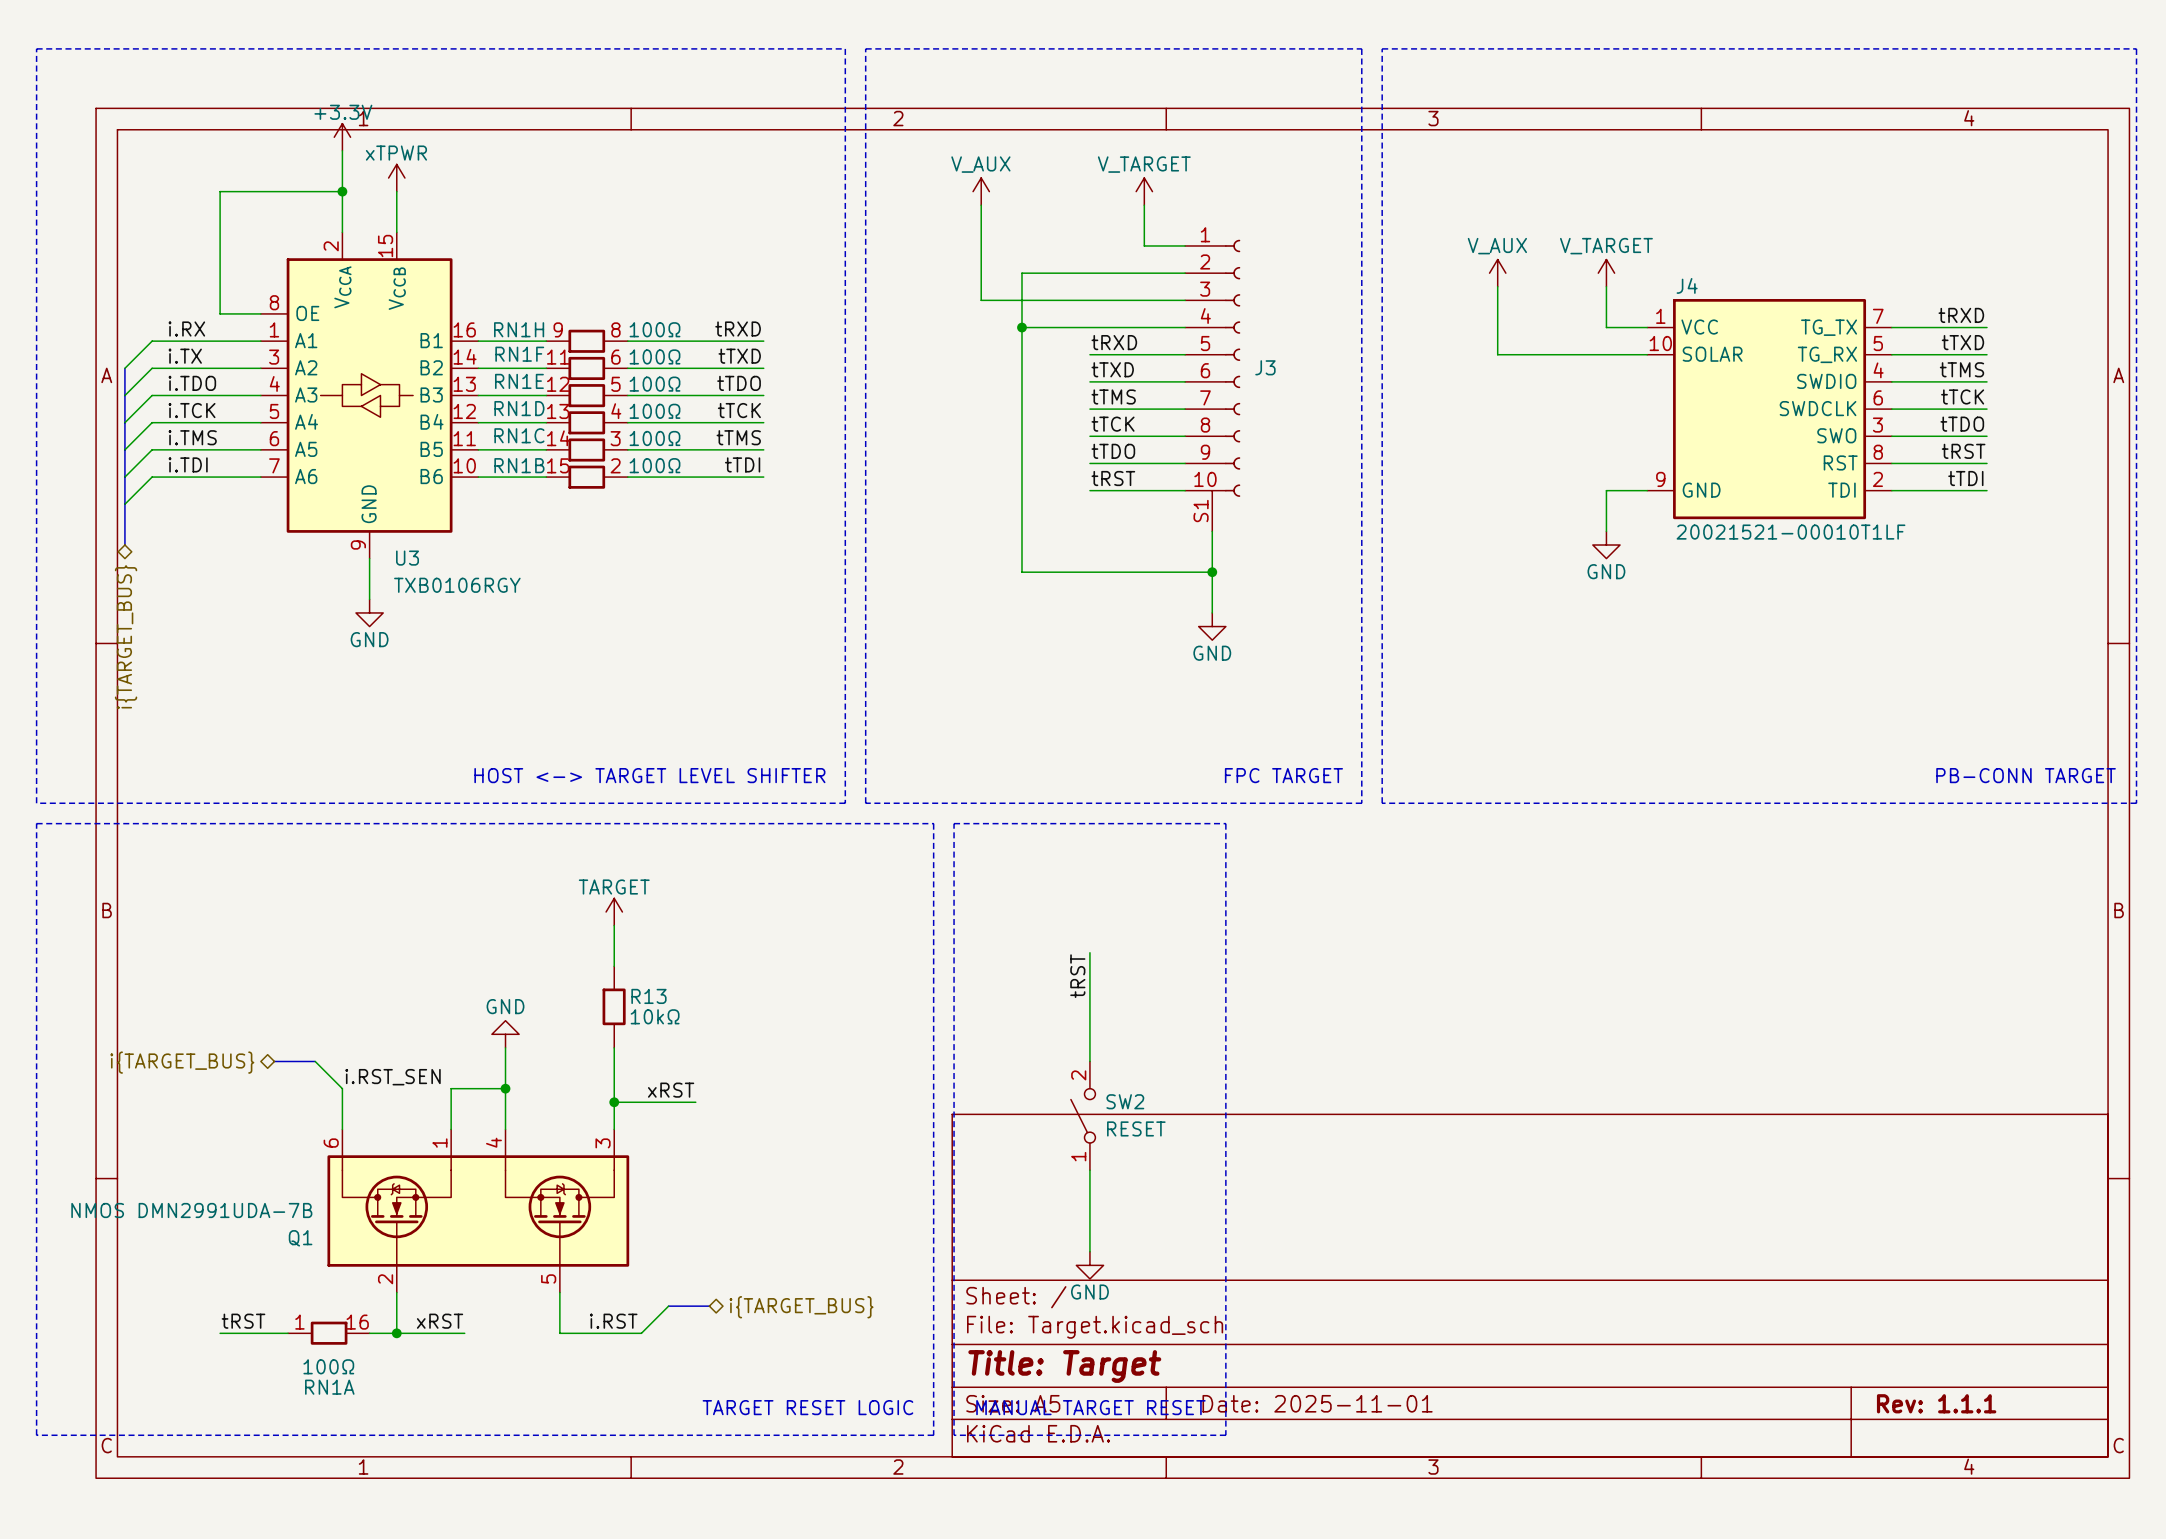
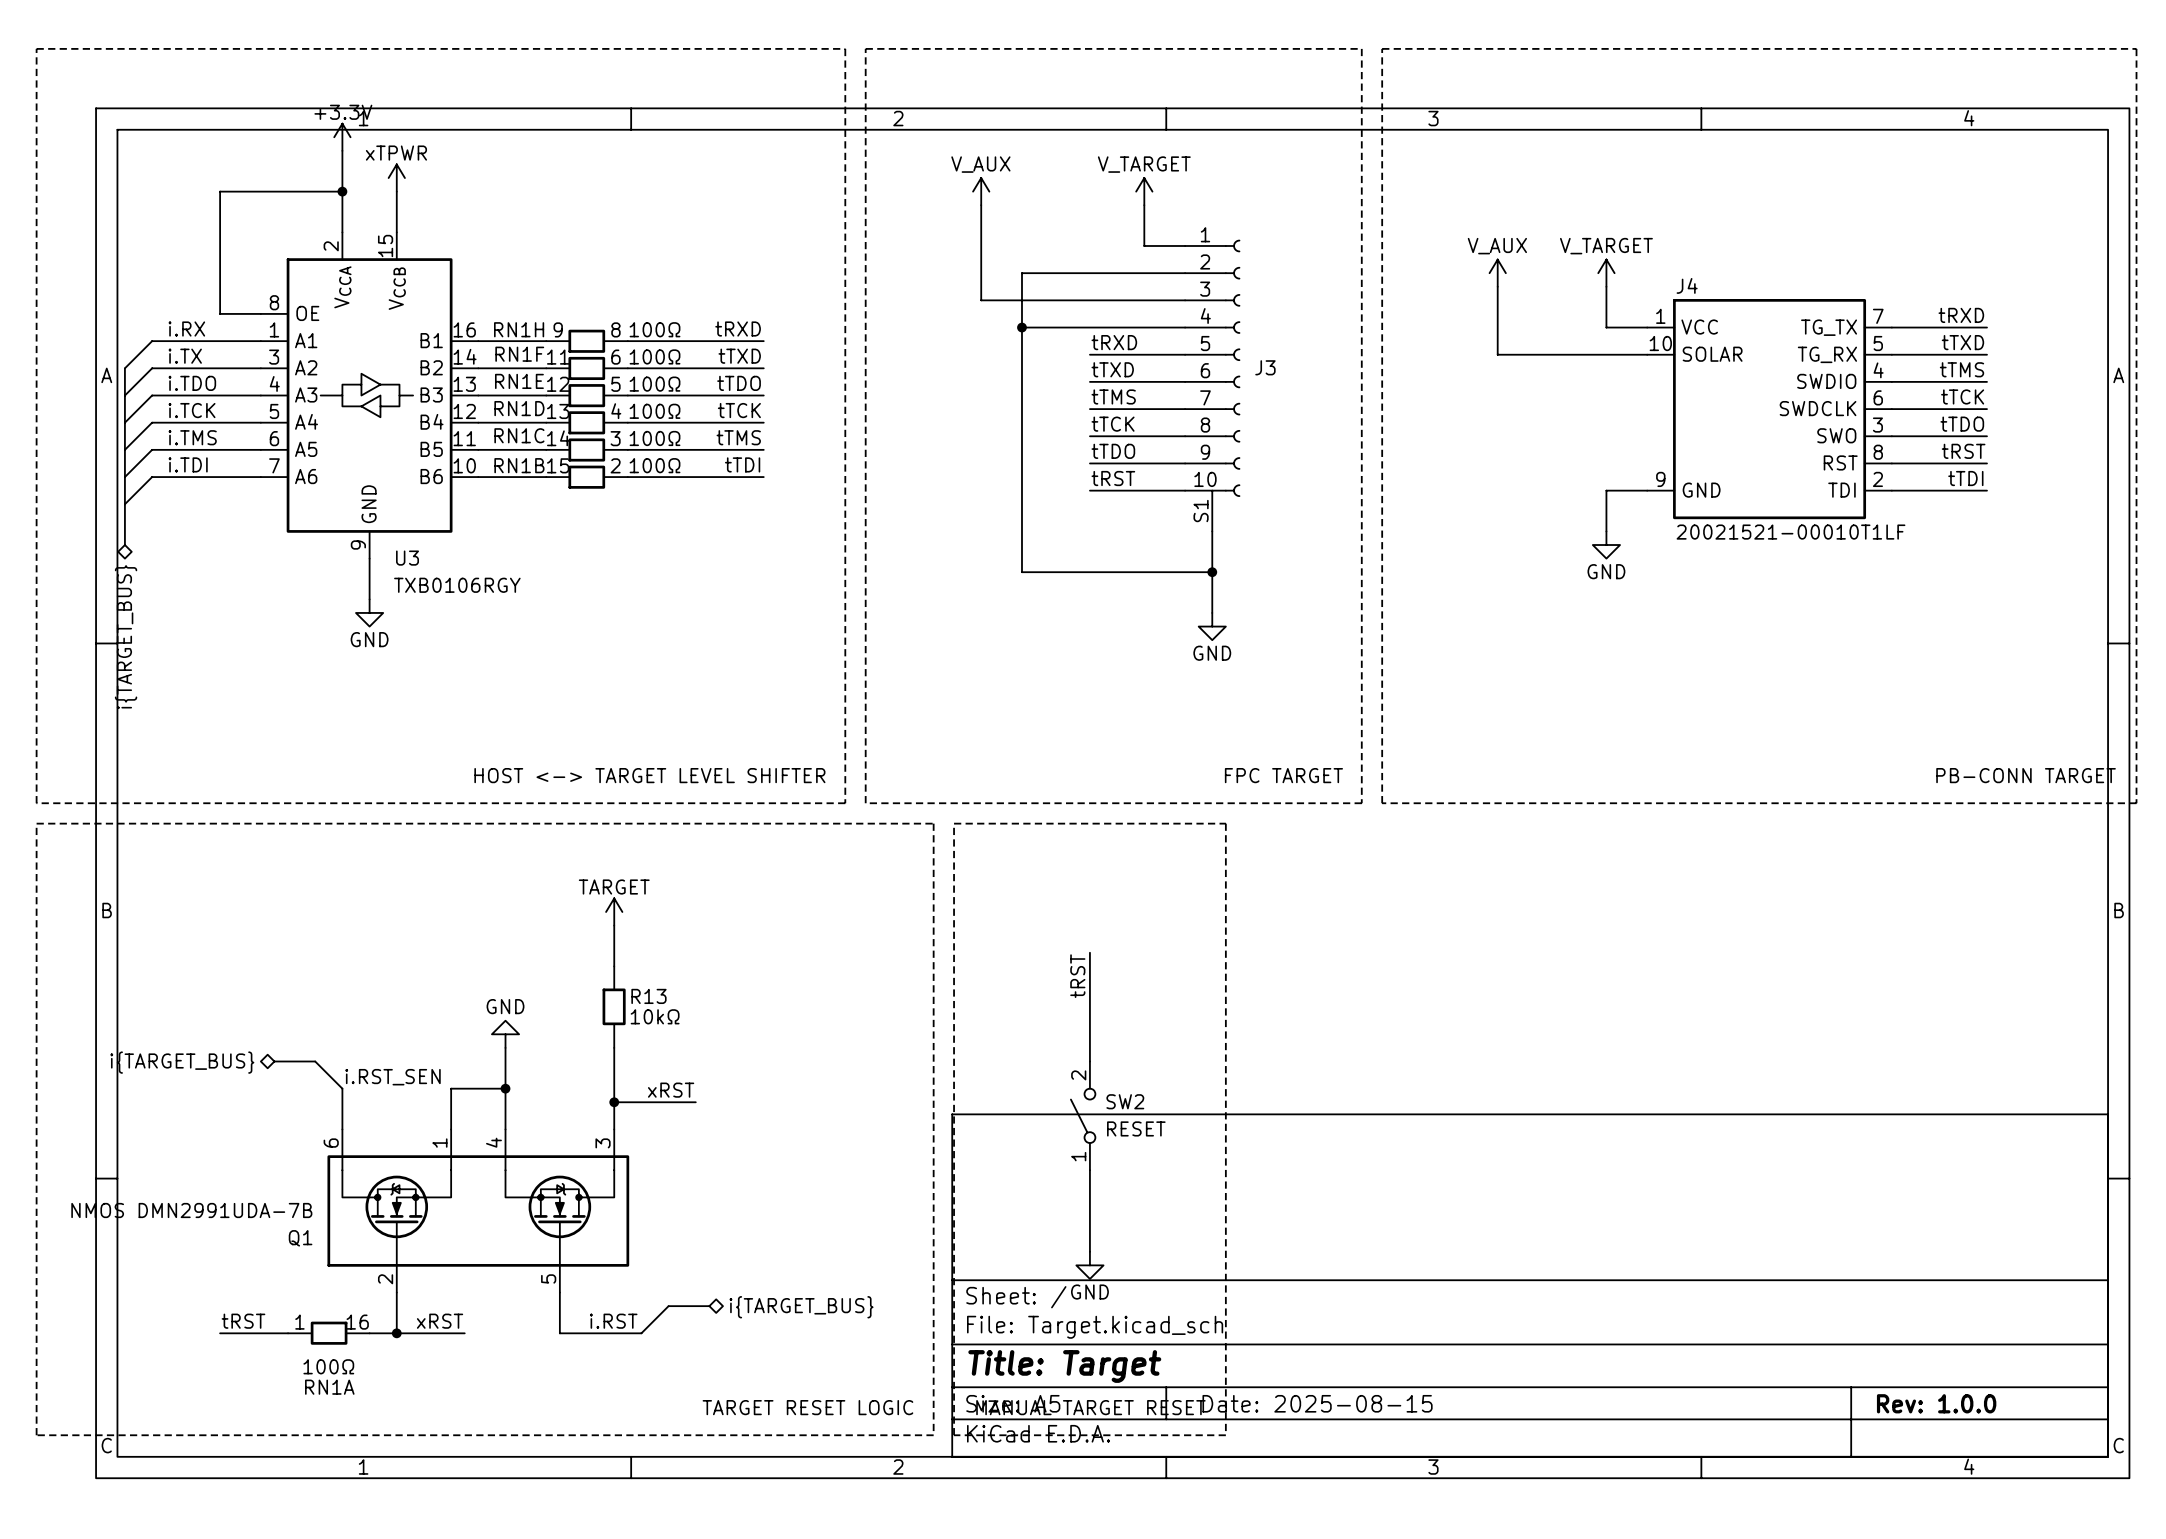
title block: Date: 2025-11-01 (1317, 1403) -> Date: 2025-08-15 (1317, 1403)
title block: Rev: 1.1.1 (1936, 1403) -> Rev: 1.0.0 (1936, 1403)

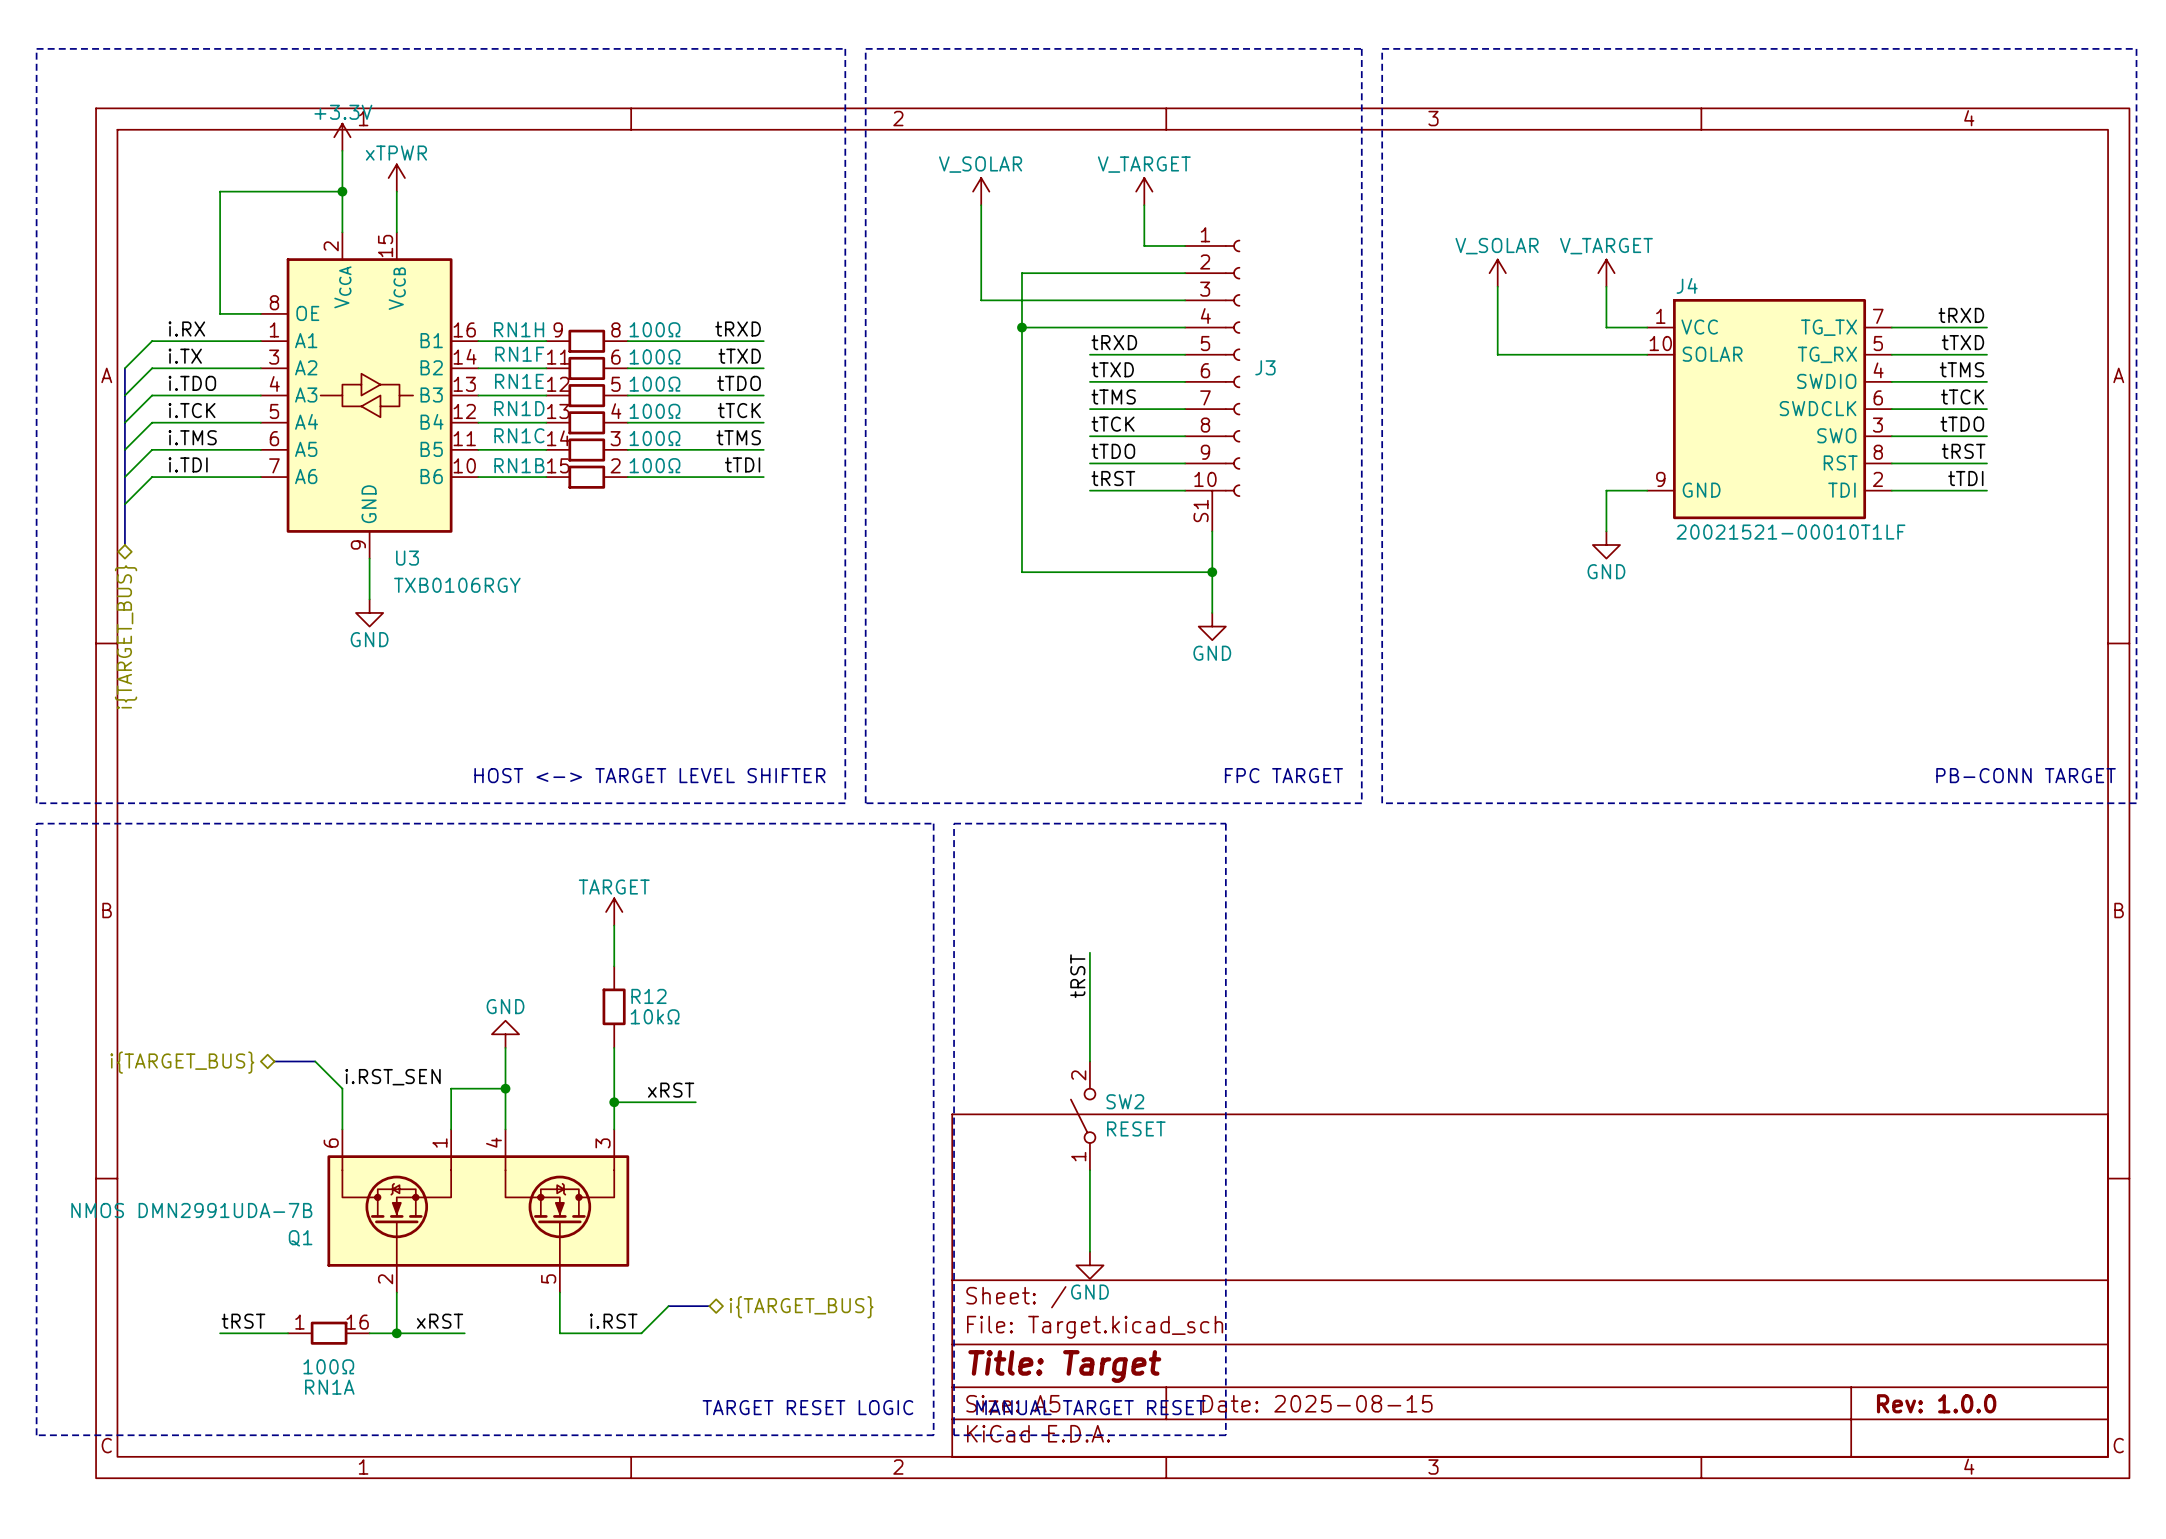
power symbol: V_AUX (981, 191) -> V_SOLAR (981, 191)
power symbol: V_AUX (1497, 273) -> V_SOLAR (1497, 273)
R13 name: R13 (648, 996) -> R12 (648, 996)

